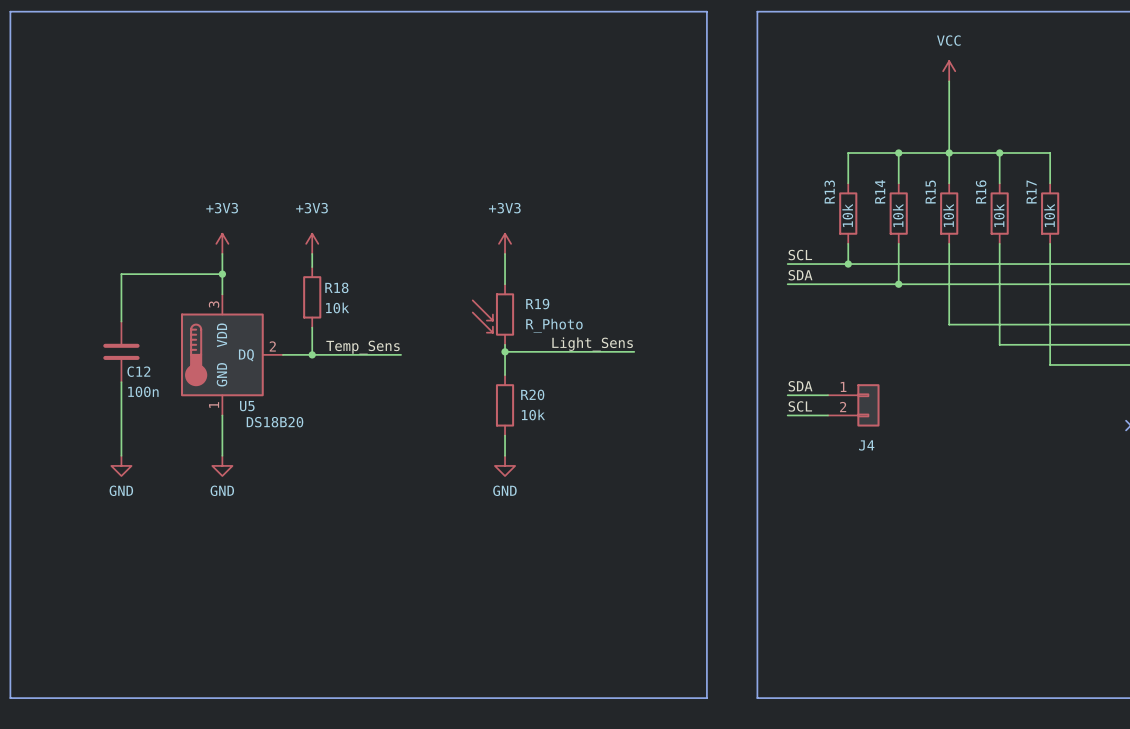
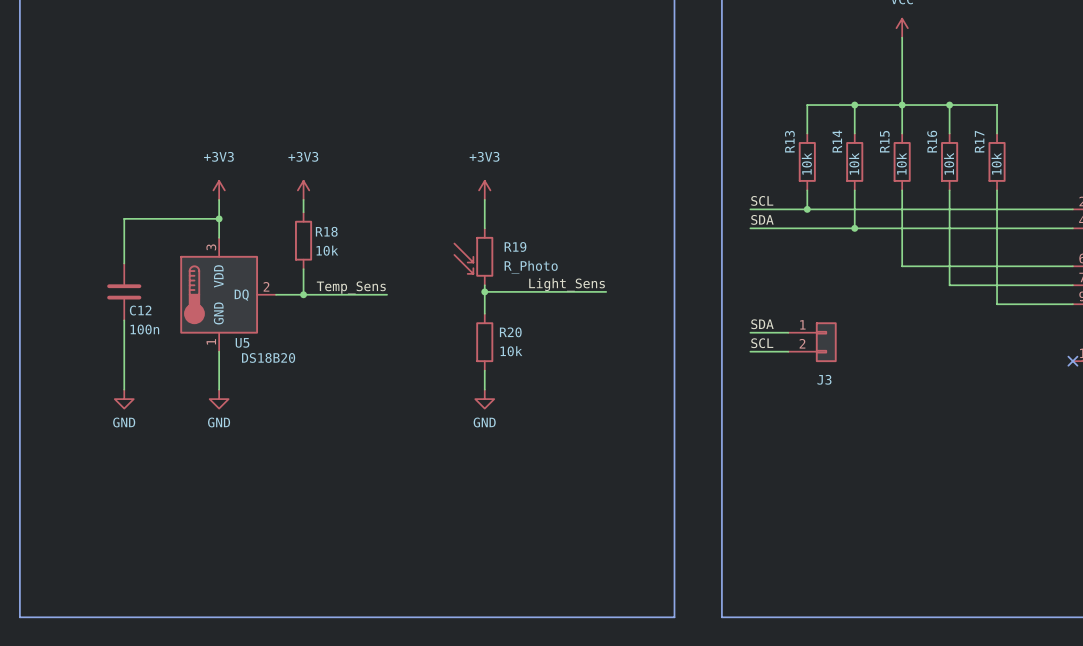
J4 name: J4 (866, 445) -> J3 (824, 379)

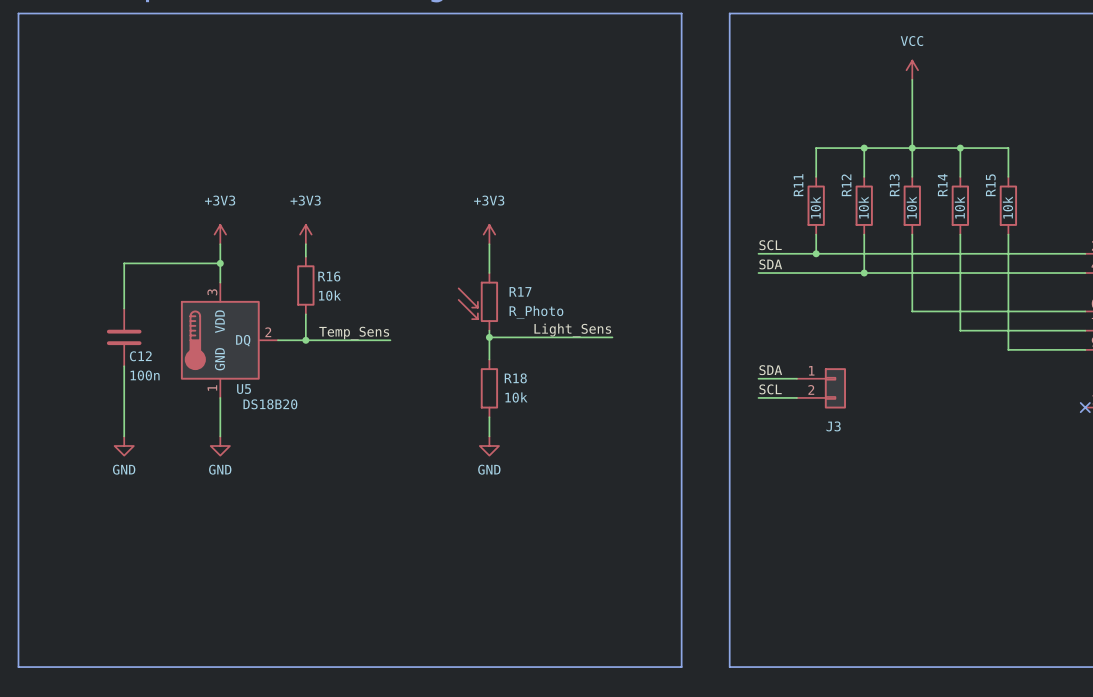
R13 name: R13 (789, 141) -> R11 (798, 185)
R14 name: R14 (837, 141) -> R12 (846, 185)
R15 name: R15 (884, 141) -> R13 (894, 185)
R16 name: R16 (932, 141) -> R14 (942, 185)
R17 name: R17 (979, 141) -> R15 (990, 185)
R18 name: R18 (326, 231) -> R16 (329, 276)
R19 name: R19 (515, 246) -> R17 (520, 291)
R20 name: R20 (510, 332) -> R18 (515, 378)

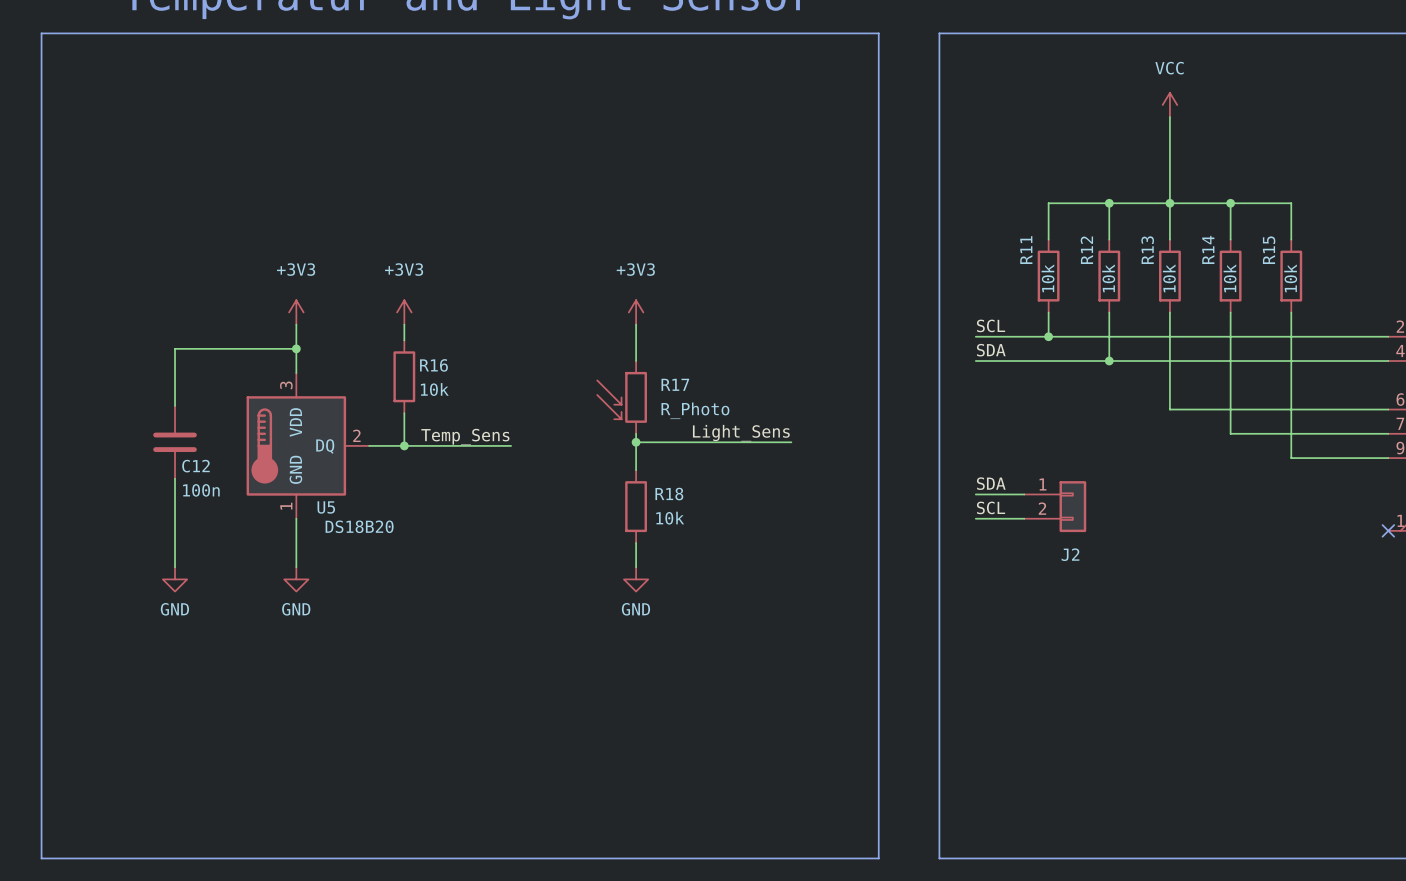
J3 name: J3 (833, 426) -> J2 (1070, 554)

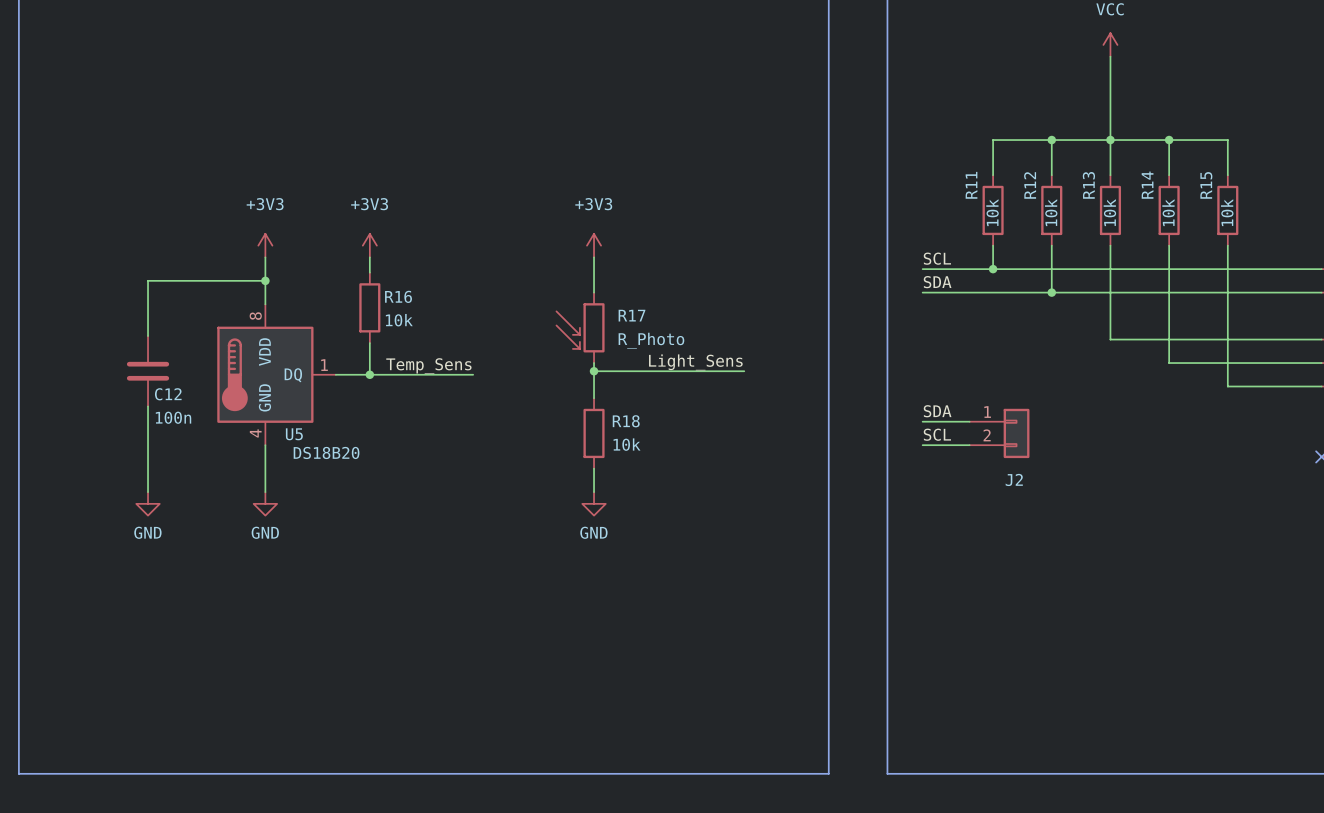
U5 pin number: 3 (286, 385) -> 8 (255, 316)
U5 pin number: 2 (356, 435) -> 1 (324, 365)
U5 pin number: 1 (286, 506) -> 4 (255, 433)

